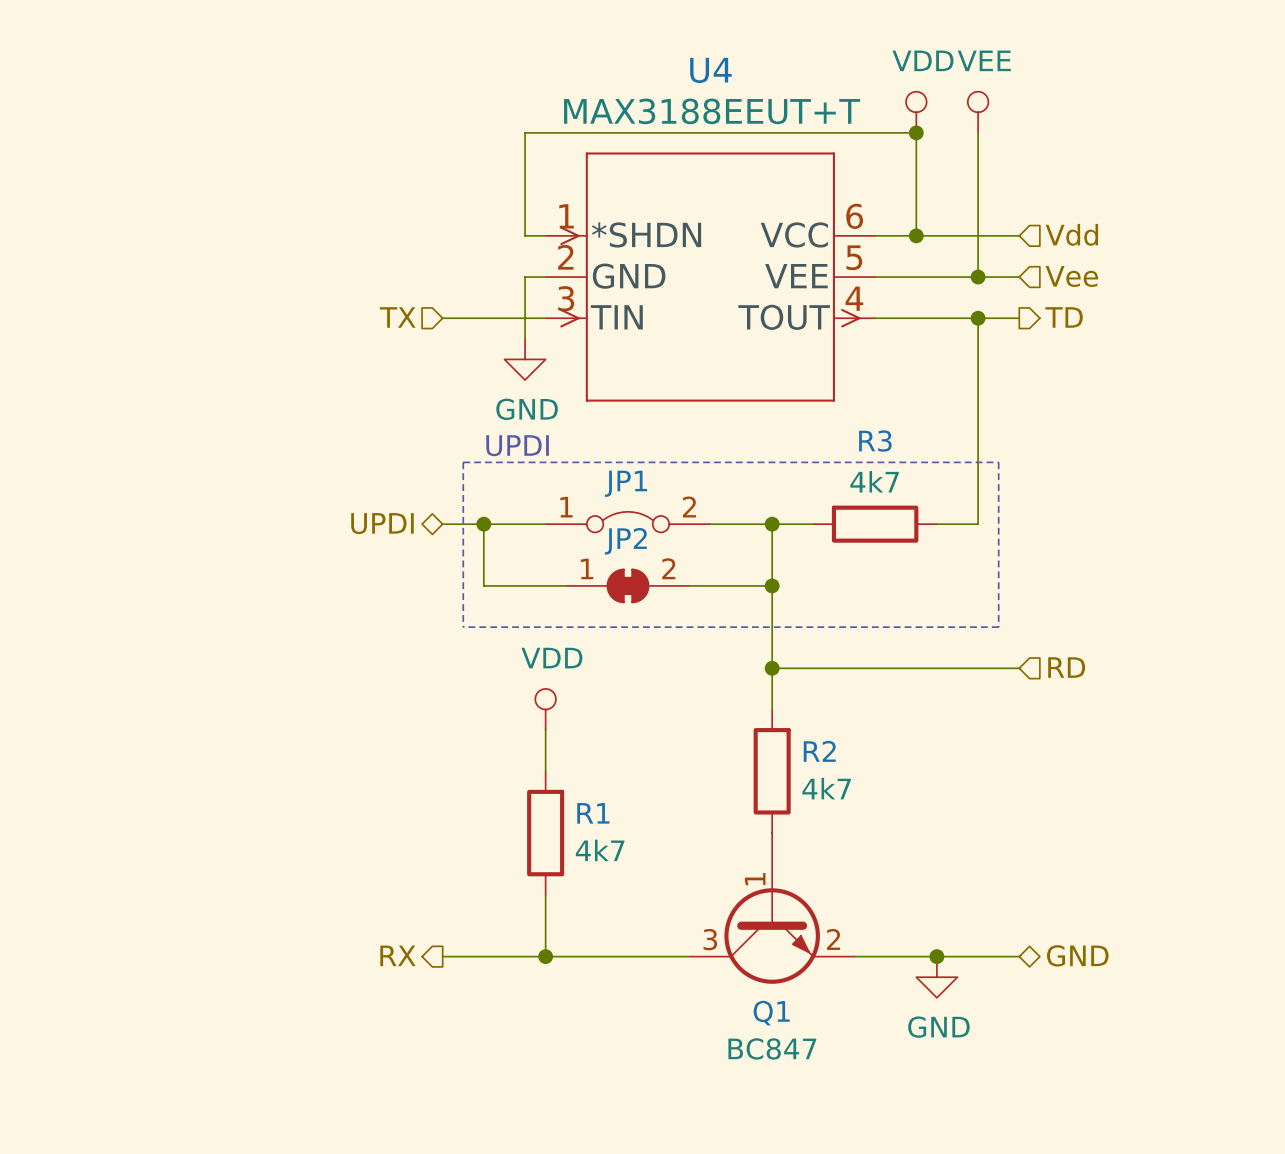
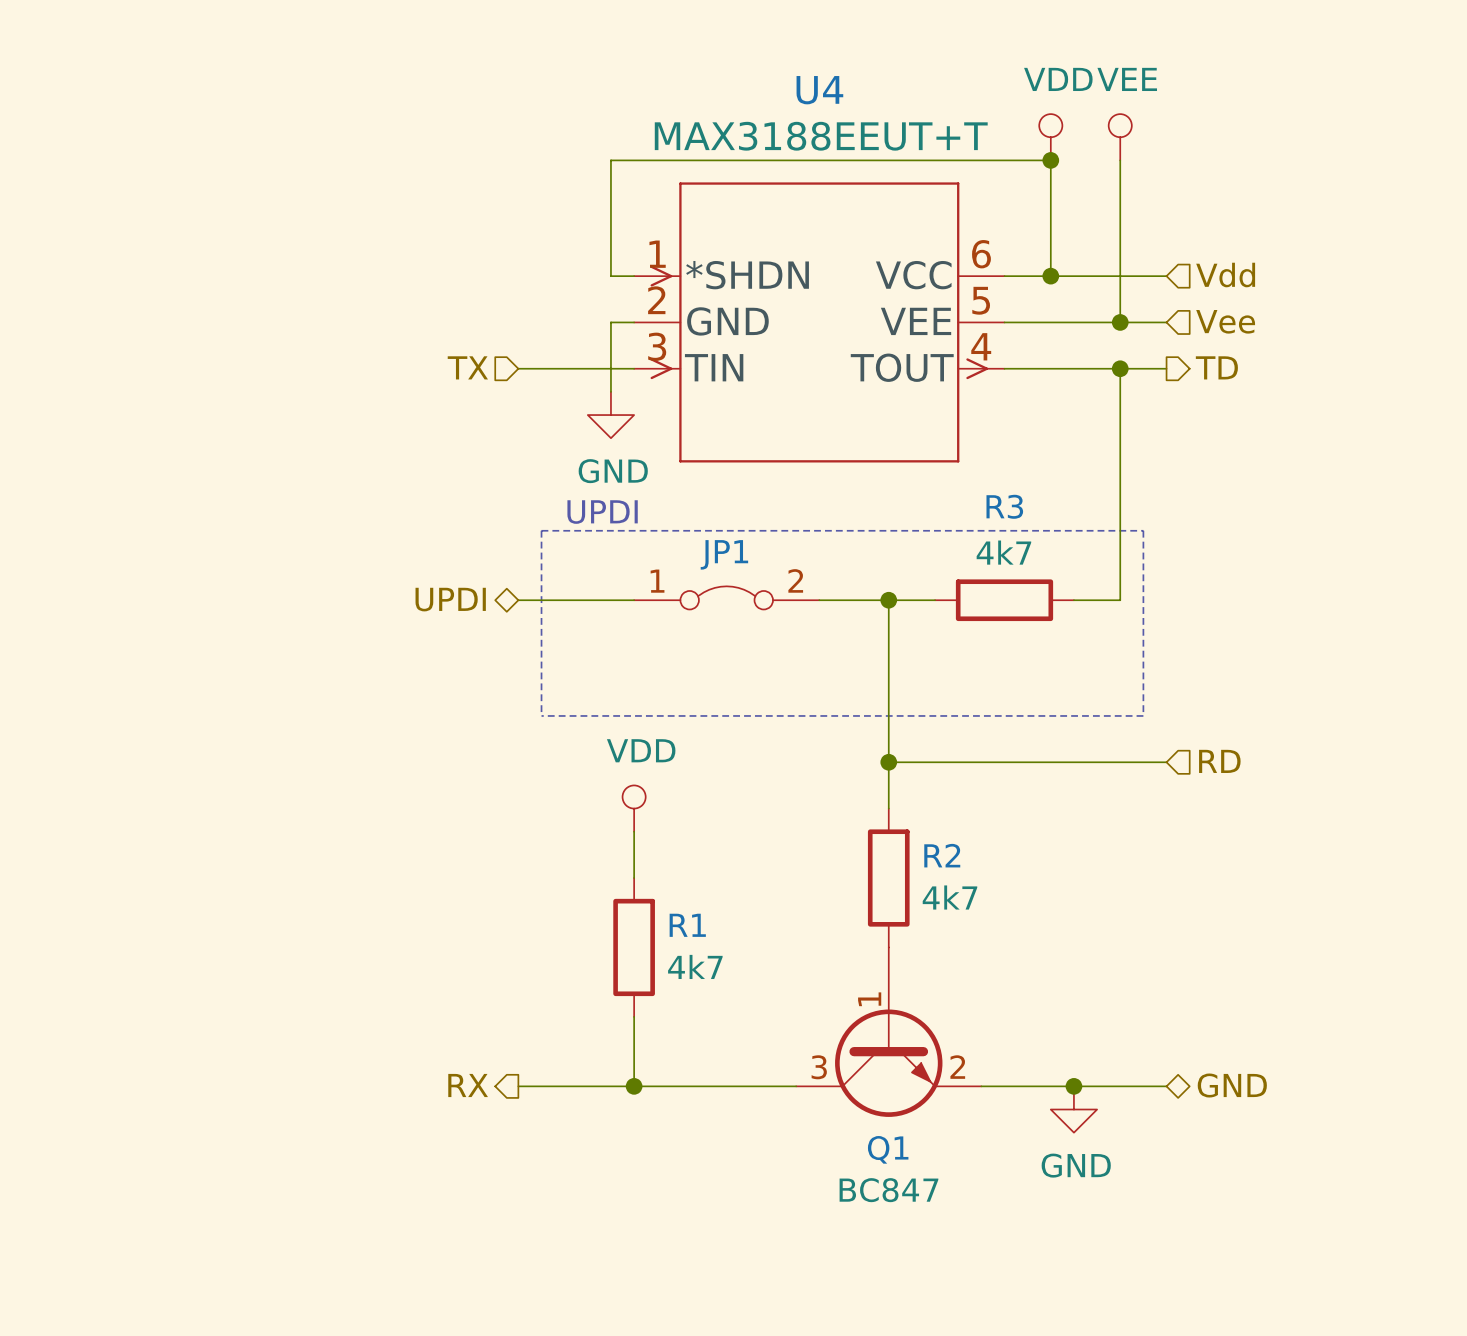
wire: (483, 524) (483, 585) (566, 585) -> none
junction: (483, 524) -> none
JP2: (628, 585) -> none
wire: (689, 585) (772, 585) -> none
junction: (772, 585) -> none

